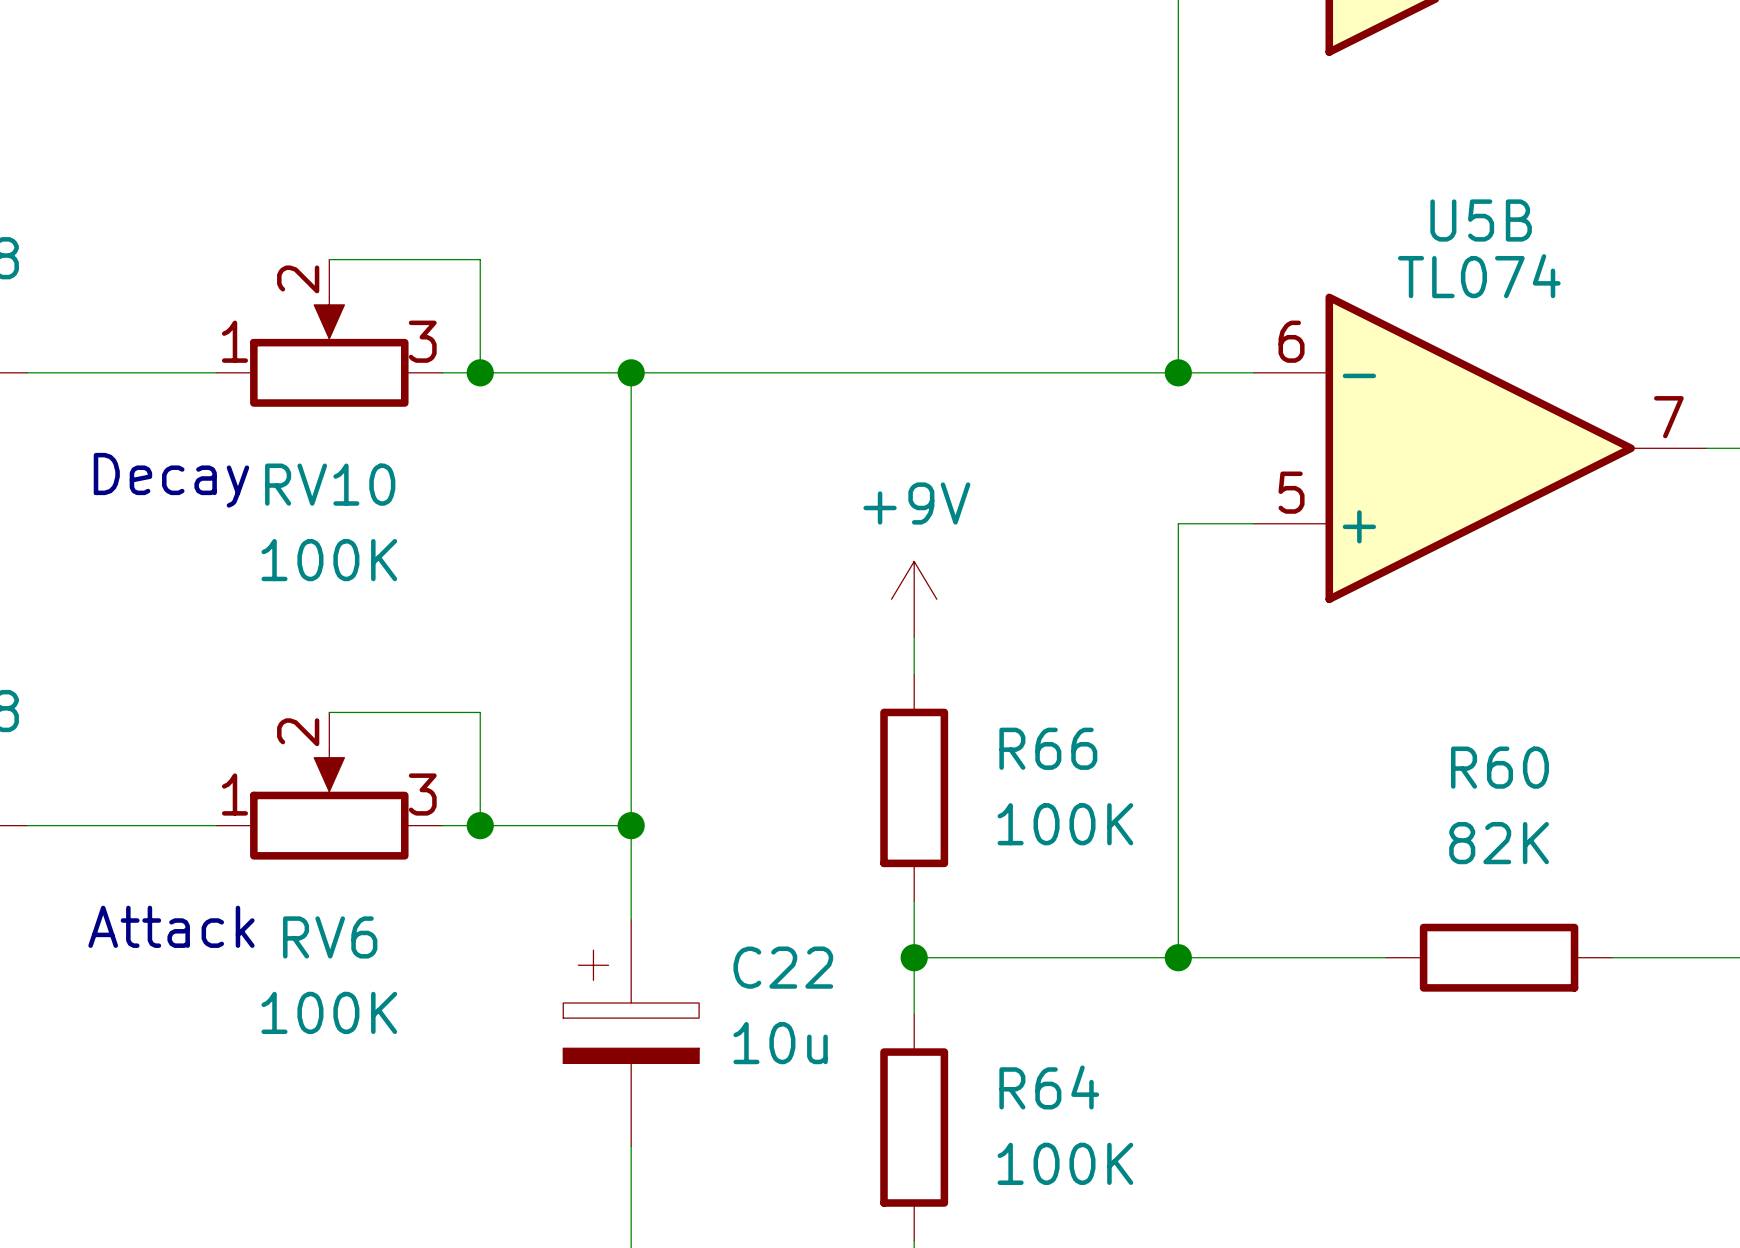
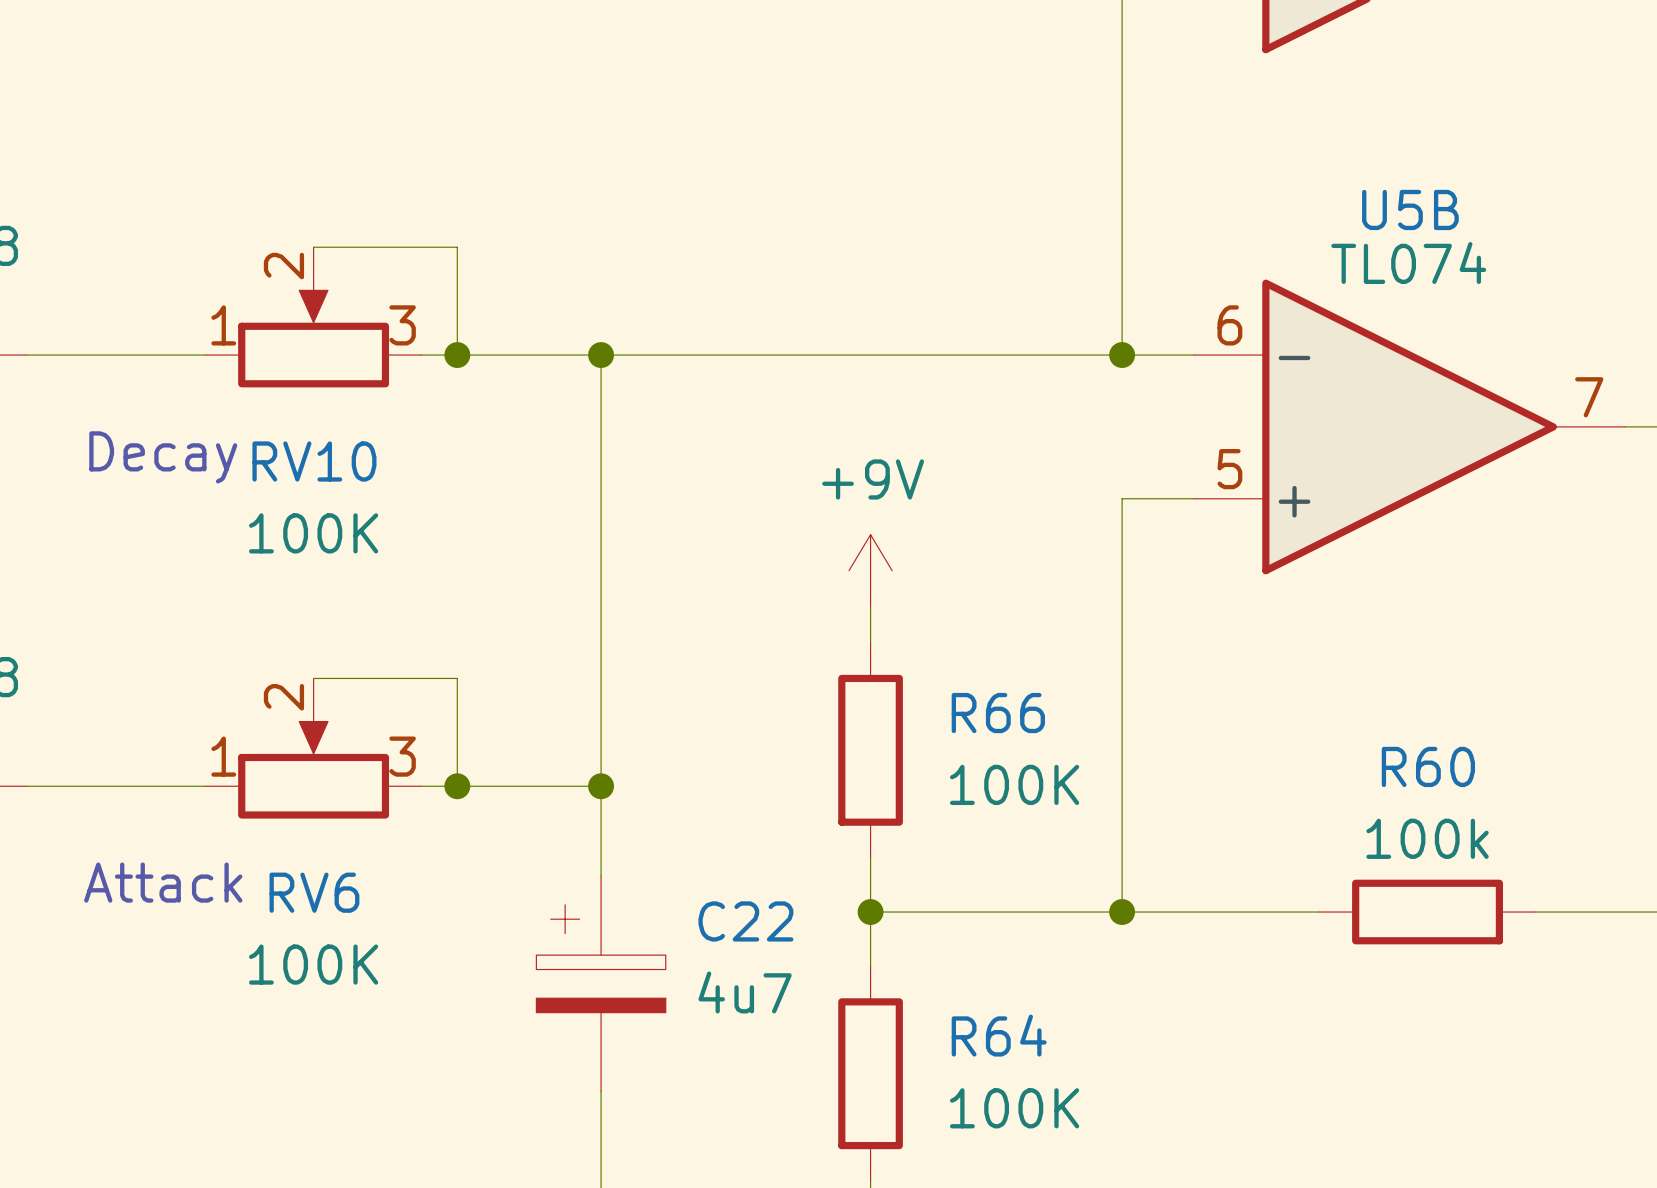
R60 name position: R60 (1499, 767) -> R60 (1428, 766)
R60 value: 82K (1499, 843) -> 100k (1427, 838)
C22 value: 10u (780, 1043) -> 4u7 (745, 992)

